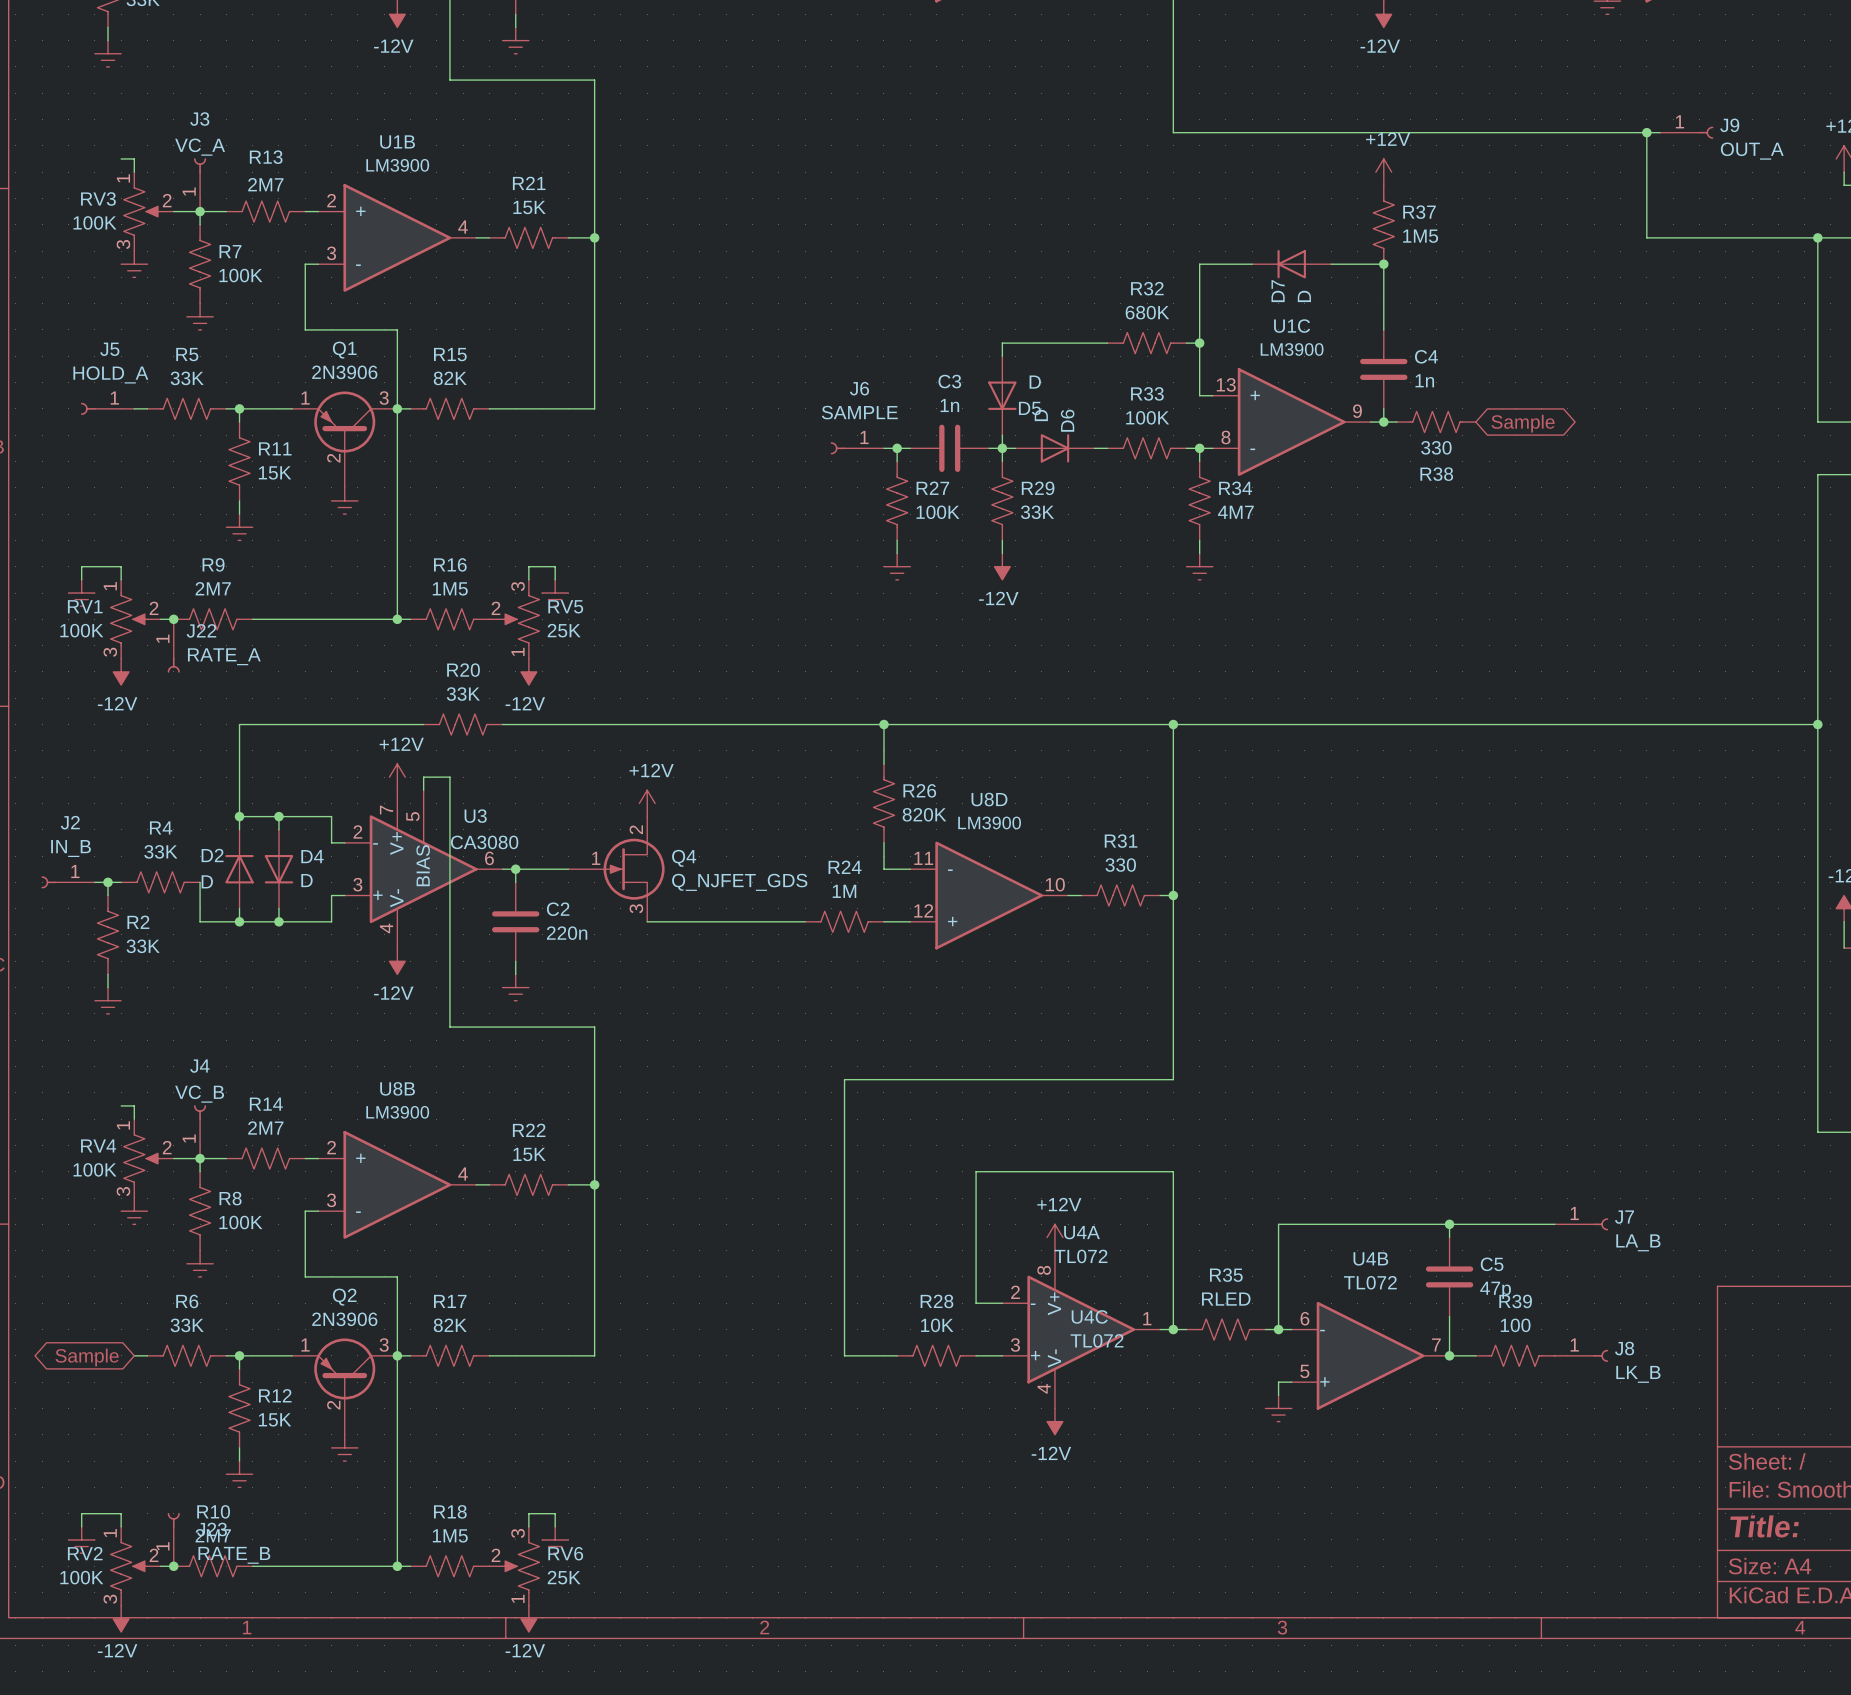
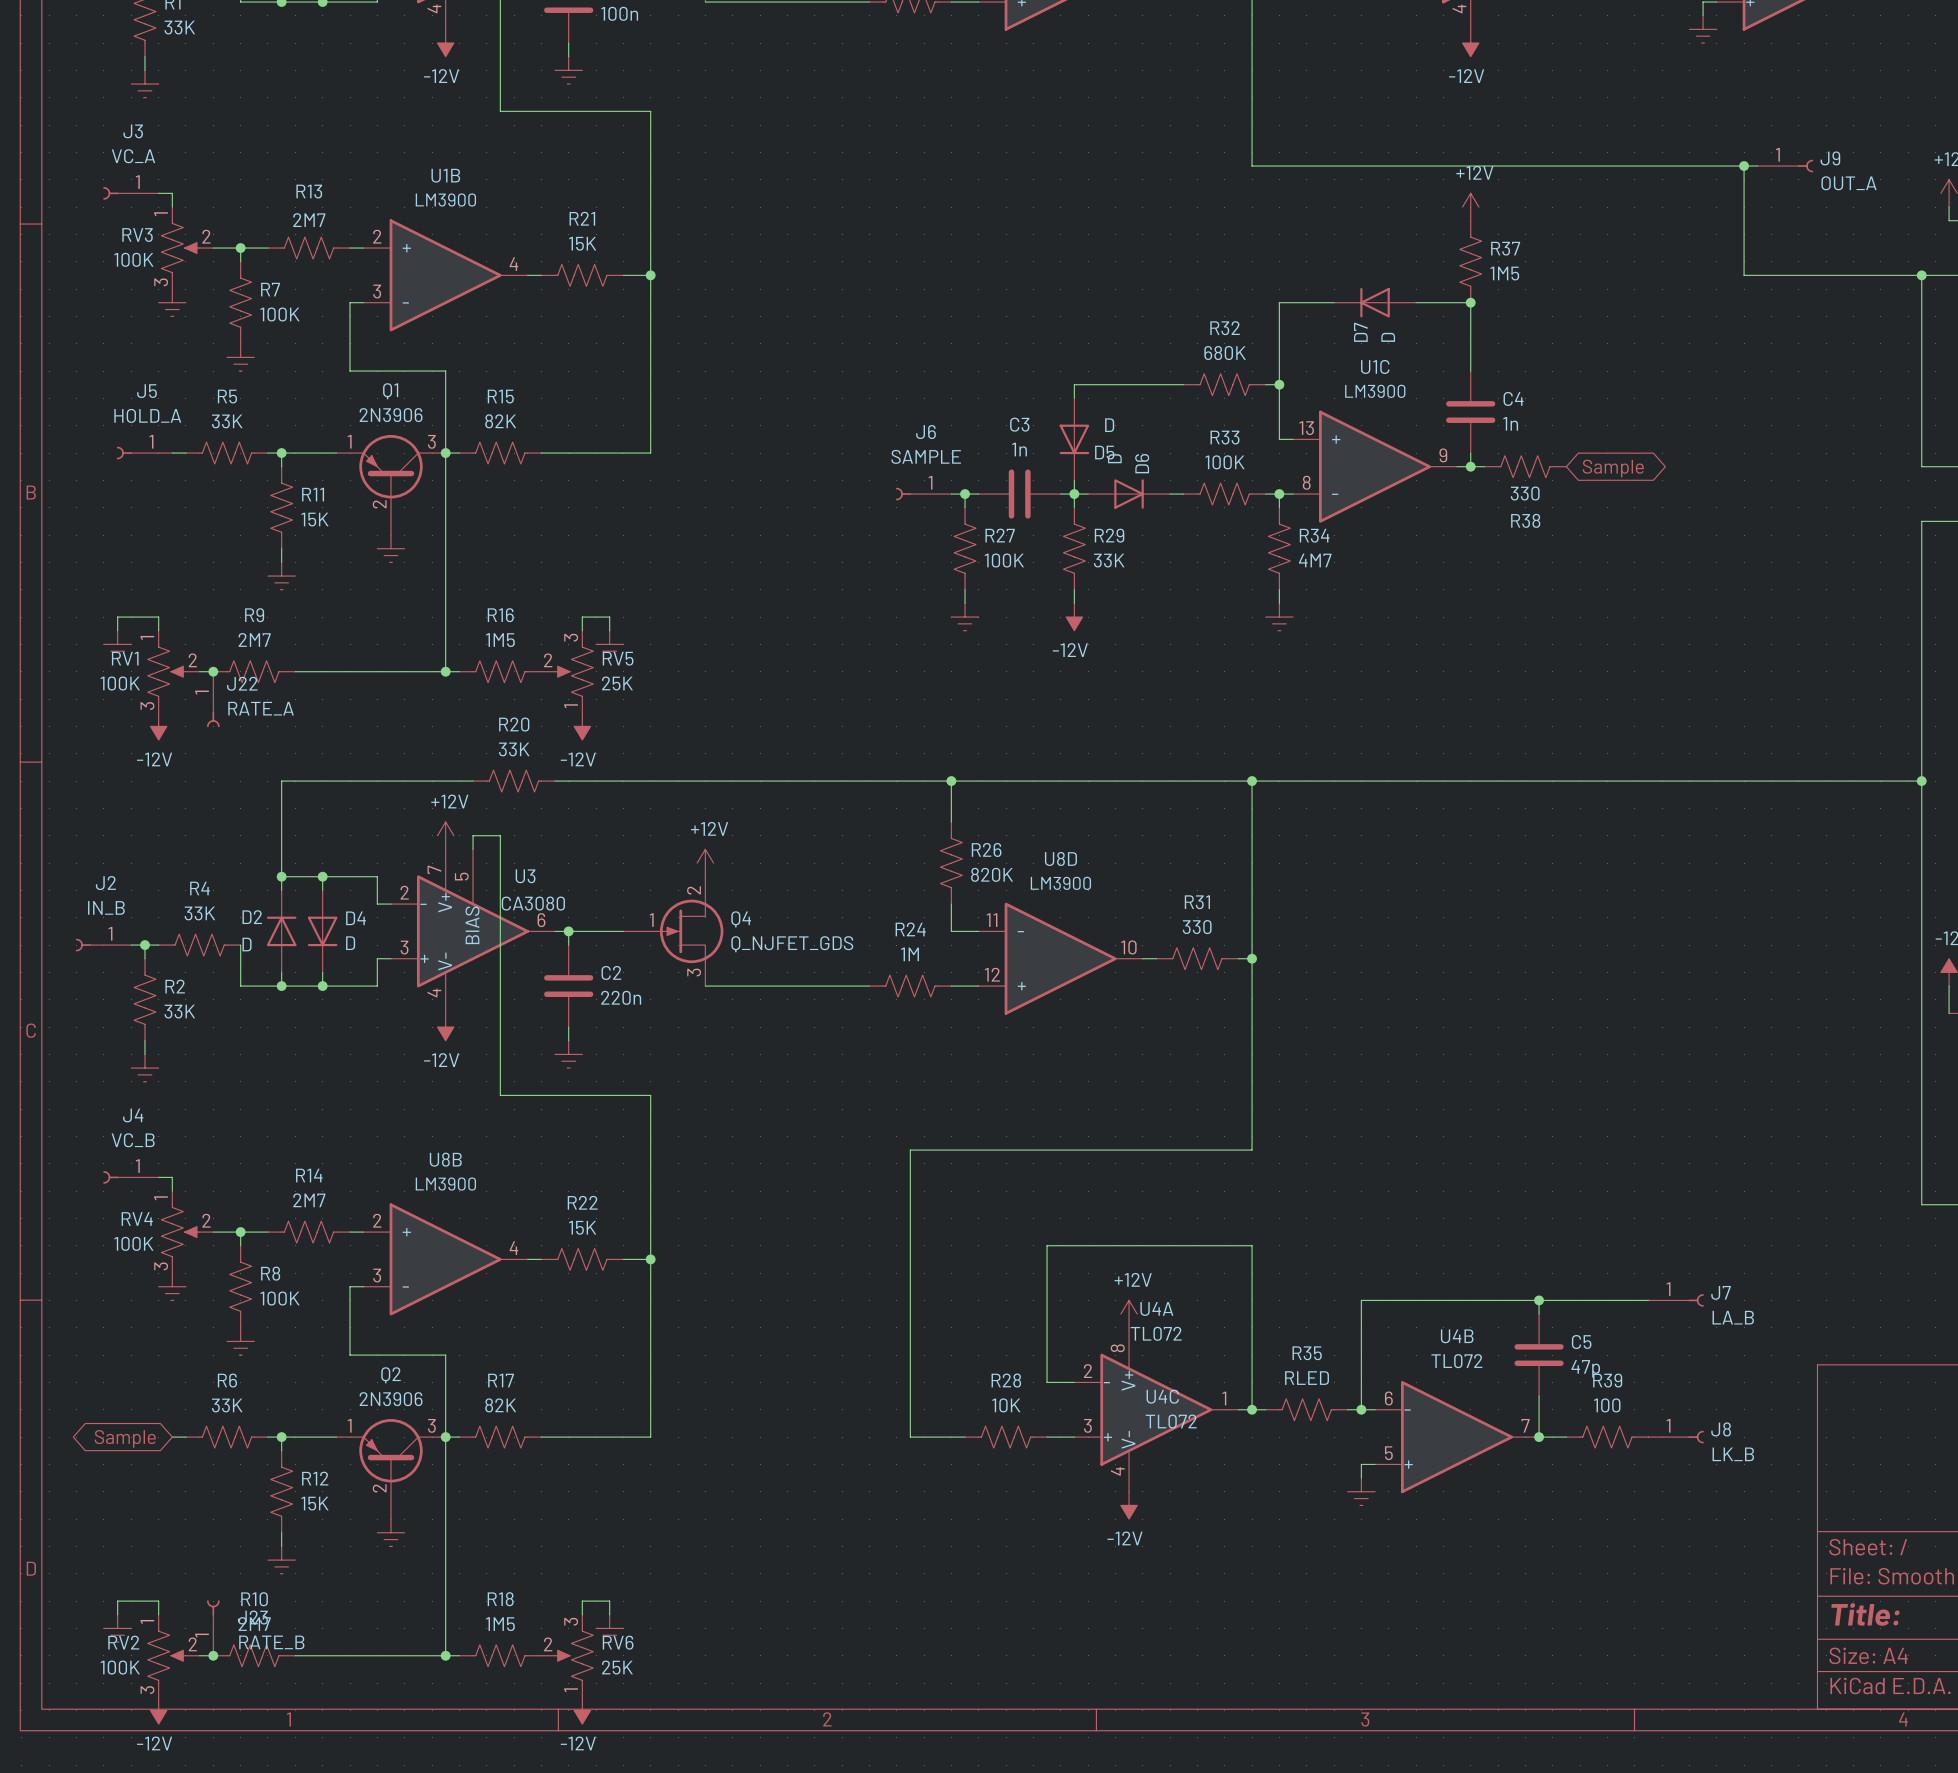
J3 rotation: 0° (200, 165) -> 90° counterclockwise (110, 193)
J3 position: (200, 184) -> (130, 193)
J4 rotation: 0° (200, 1112) -> 90° counterclockwise (110, 1177)
J4 position: (200, 1131) -> (130, 1177)

